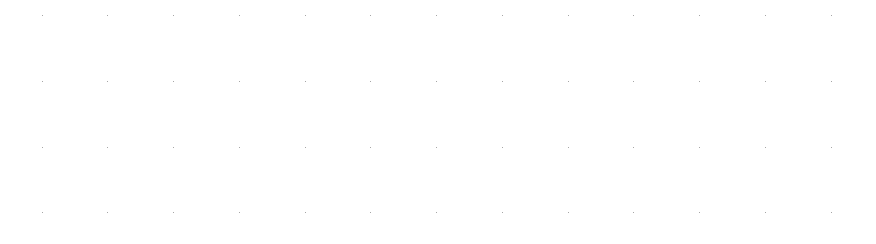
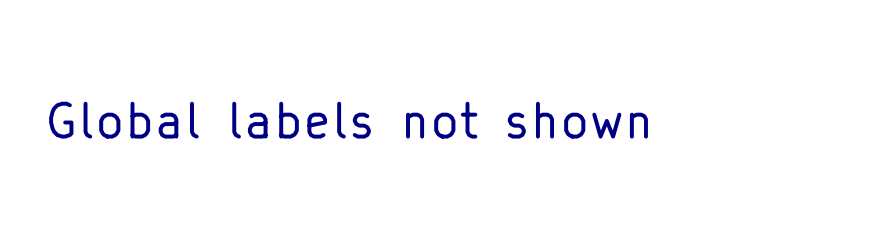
text: none -> Global labels not shown (348, 120)

